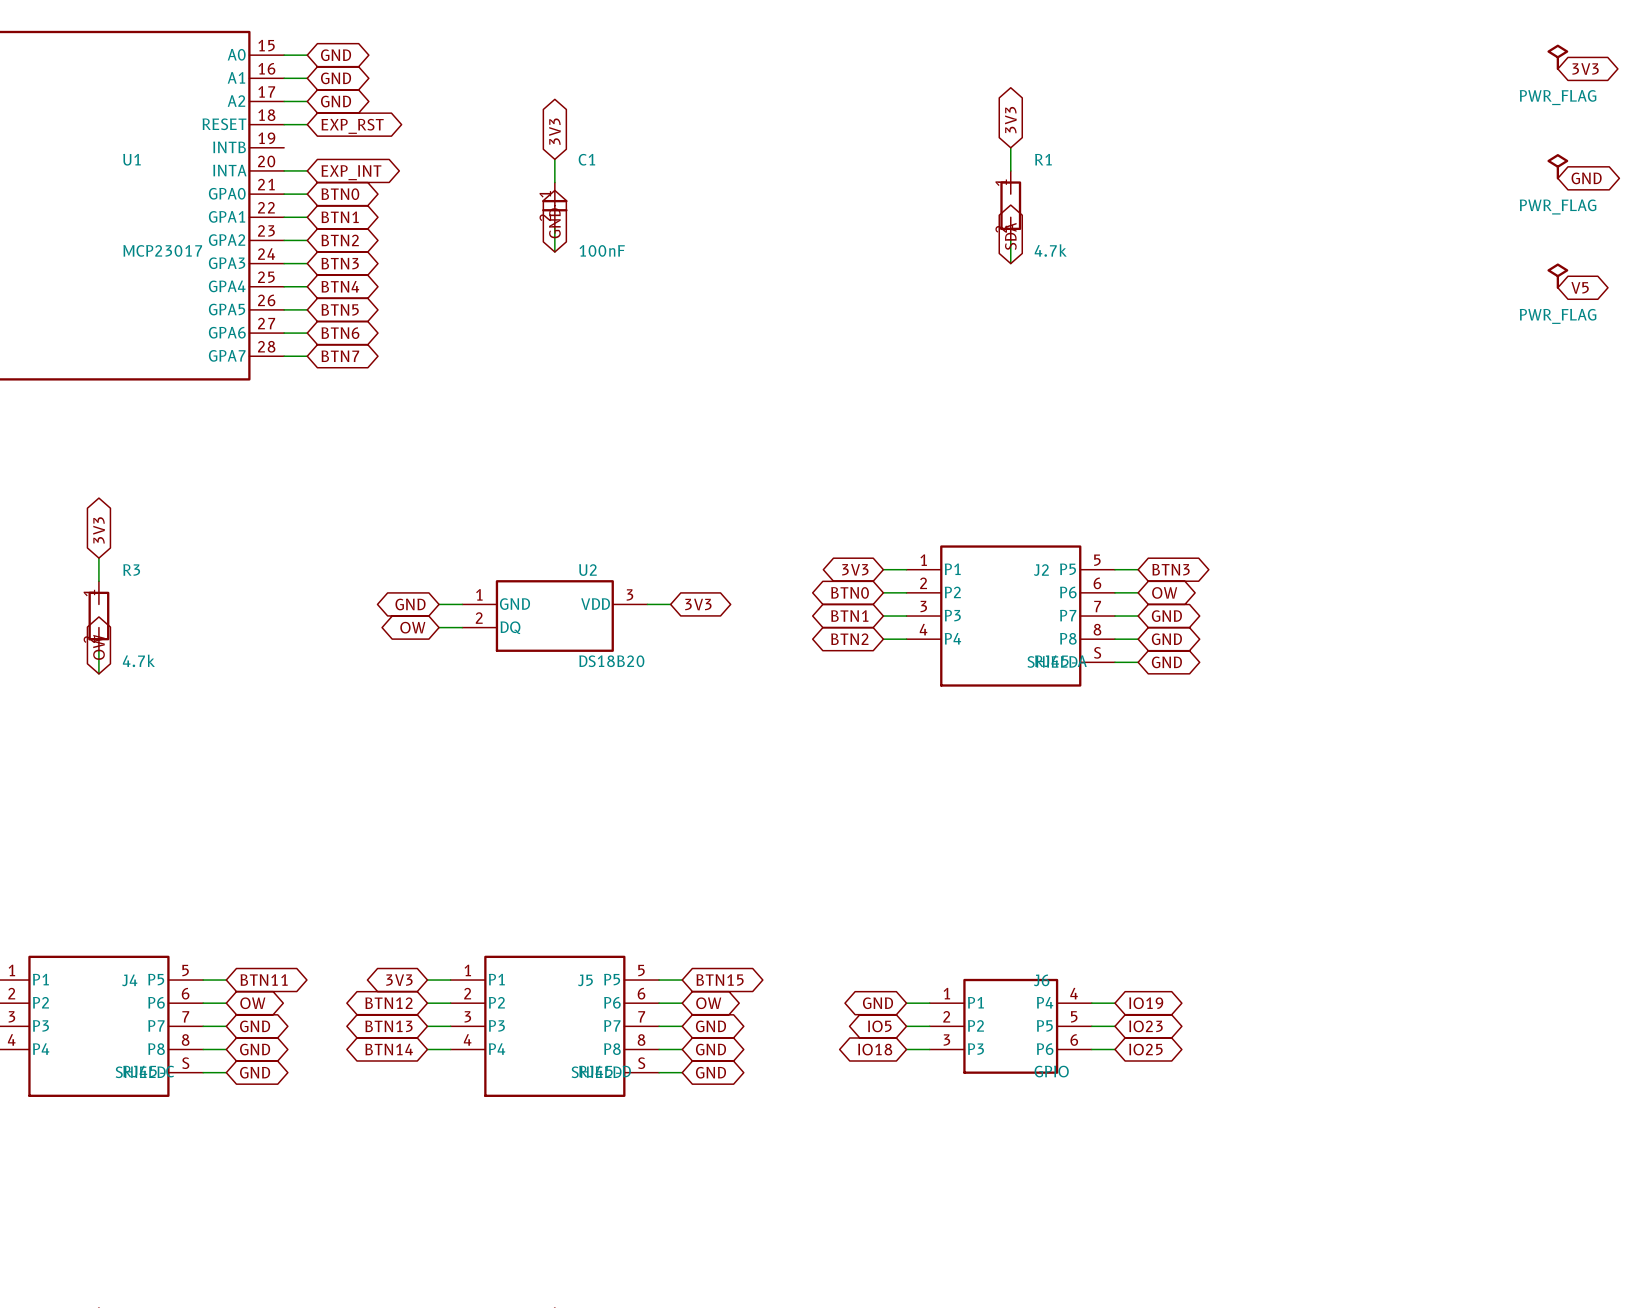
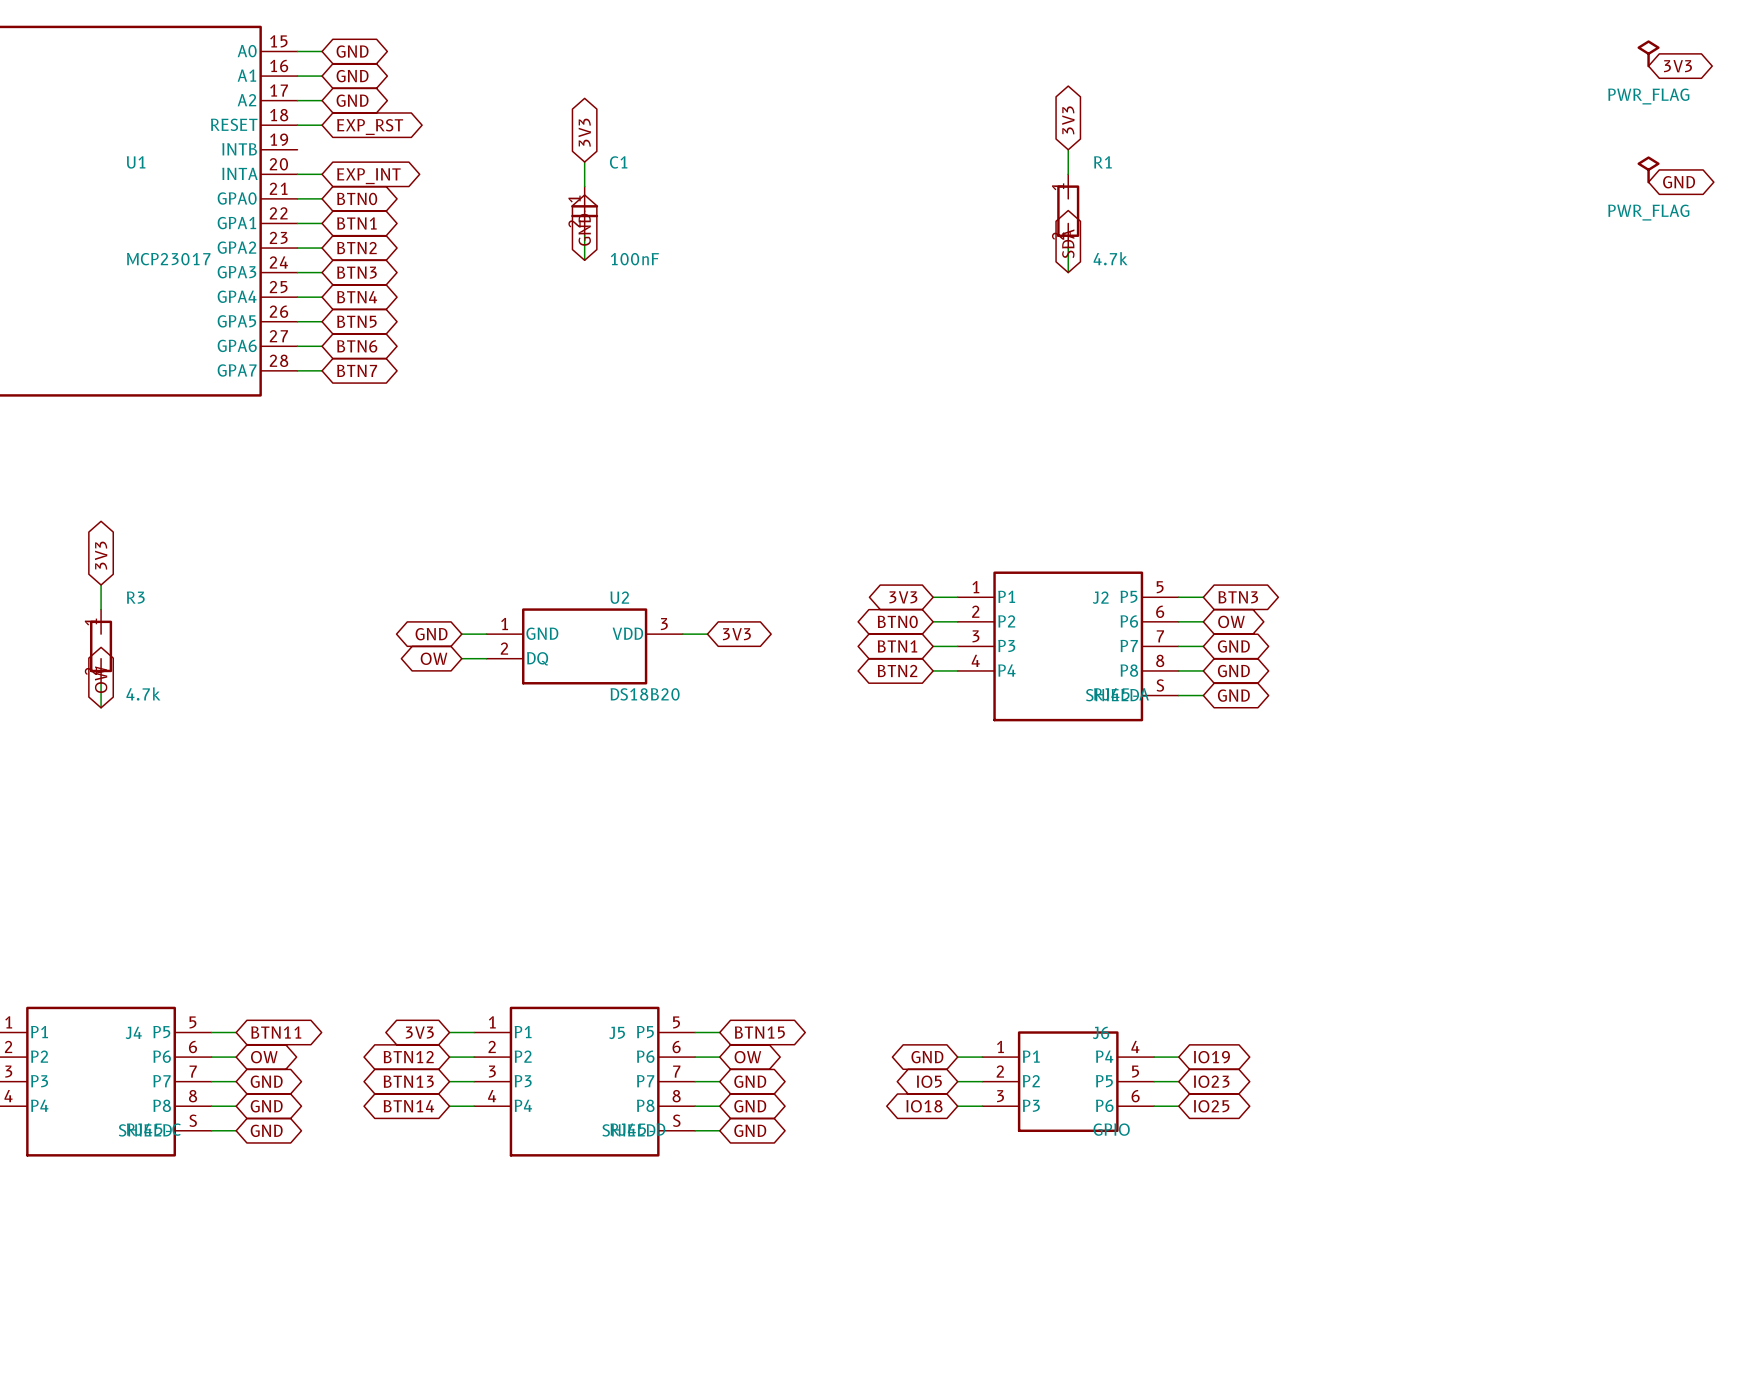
power symbol: PWR_FLAG (1557, 276) -> none
global label: V5 (1580, 287) -> none

